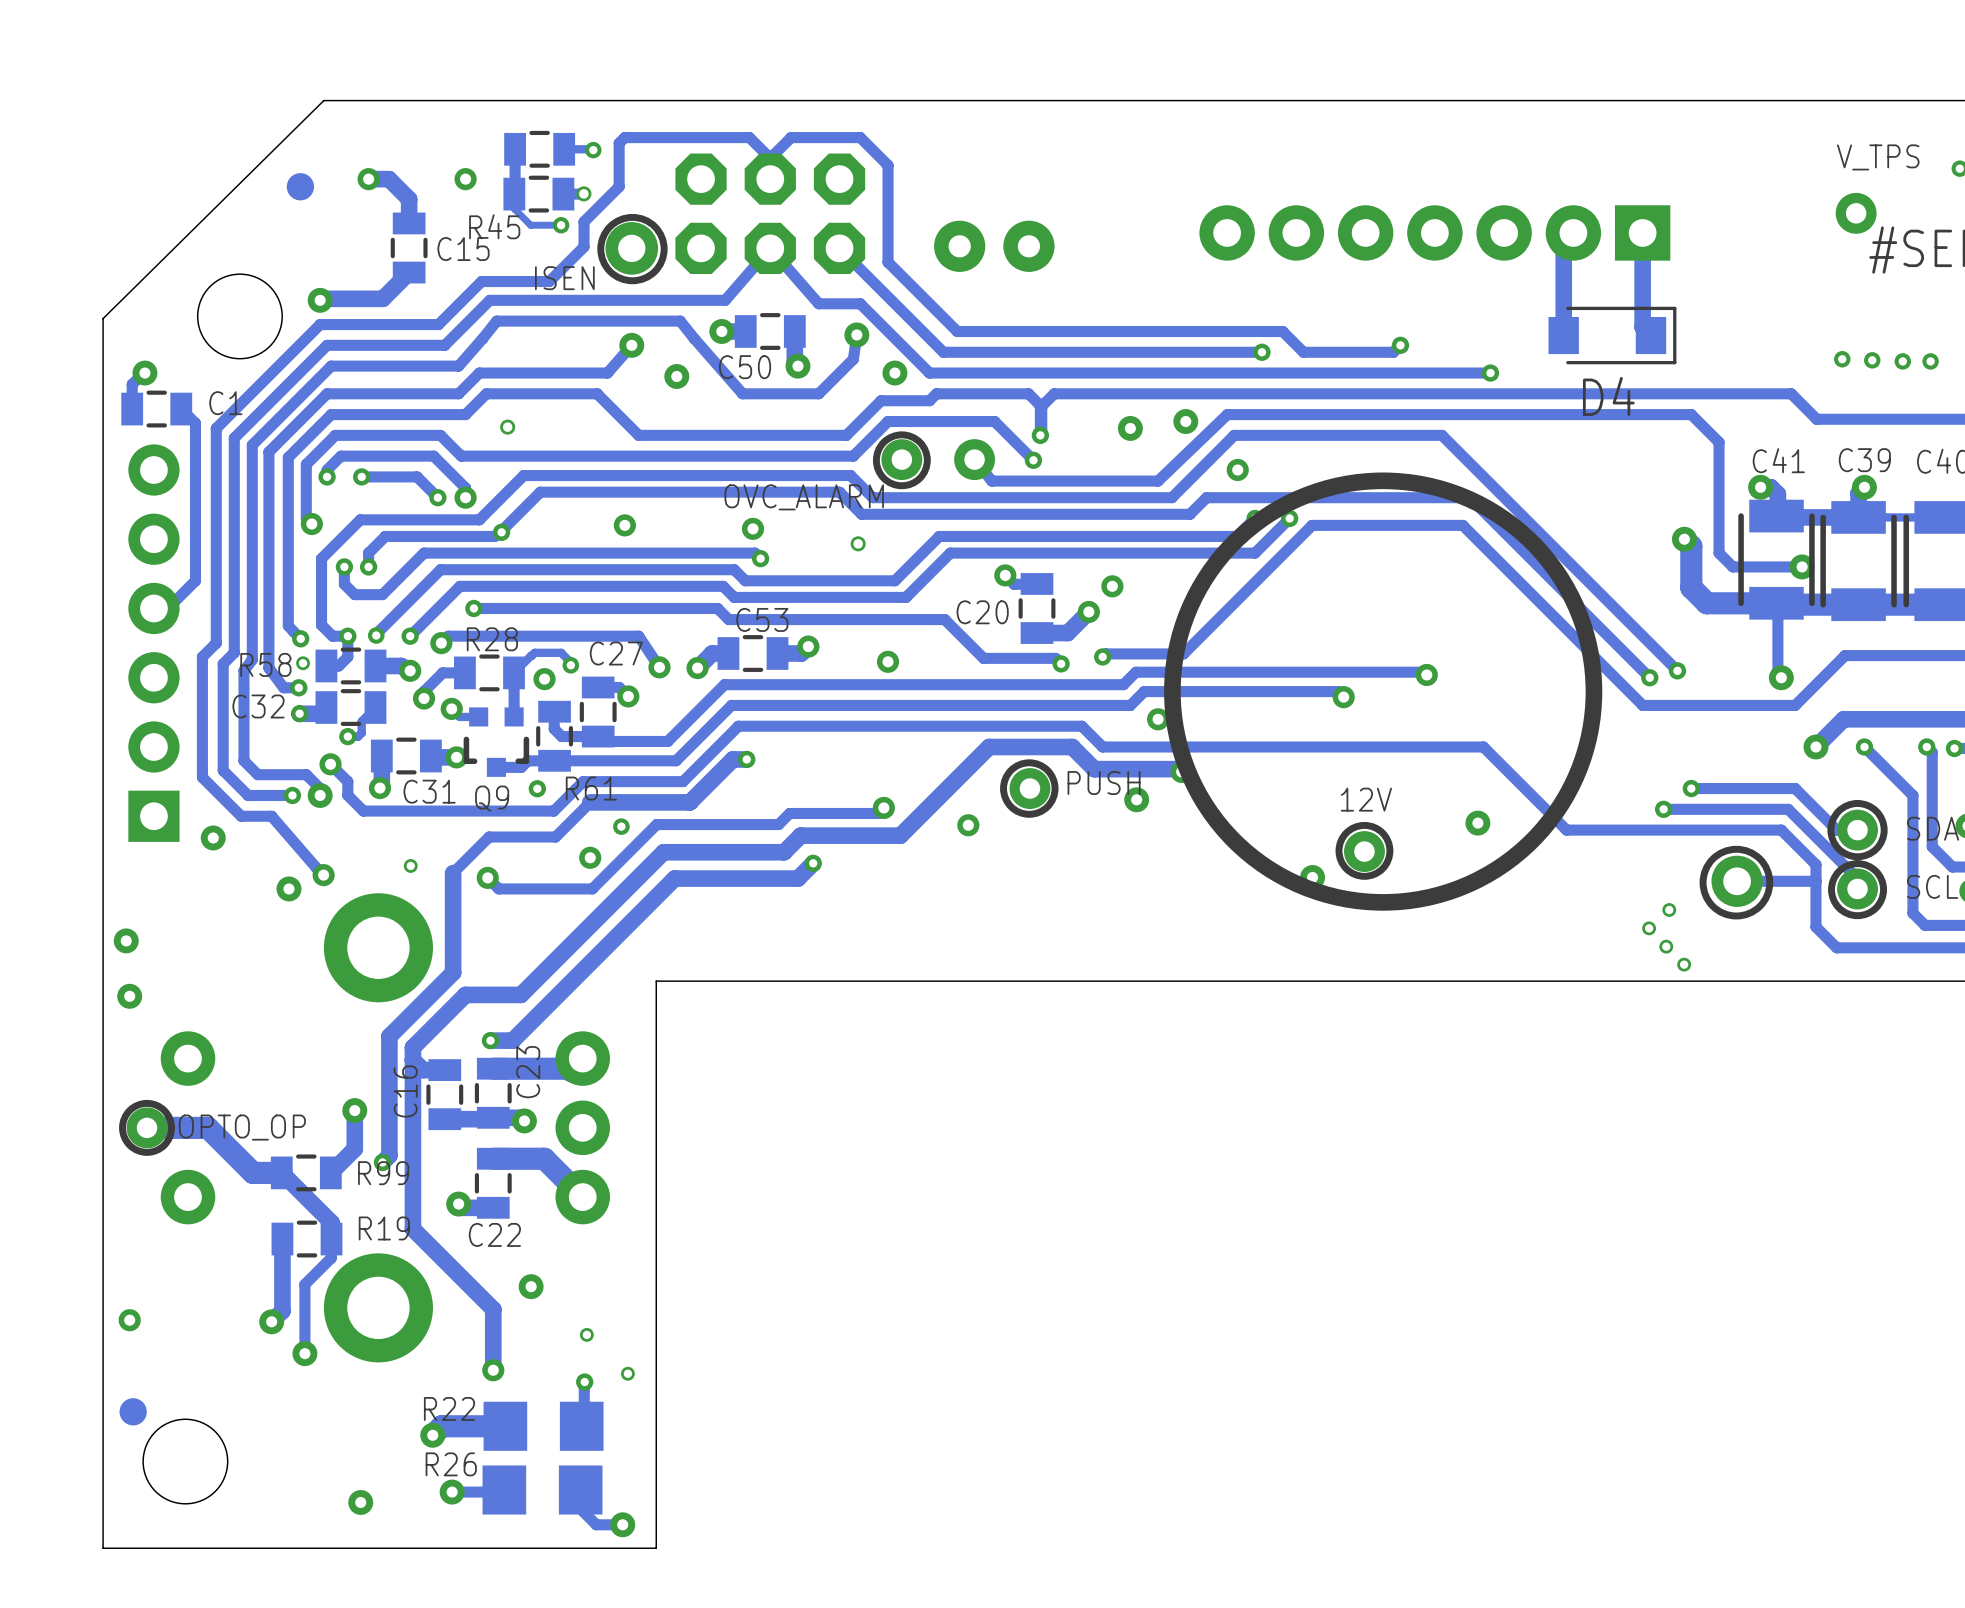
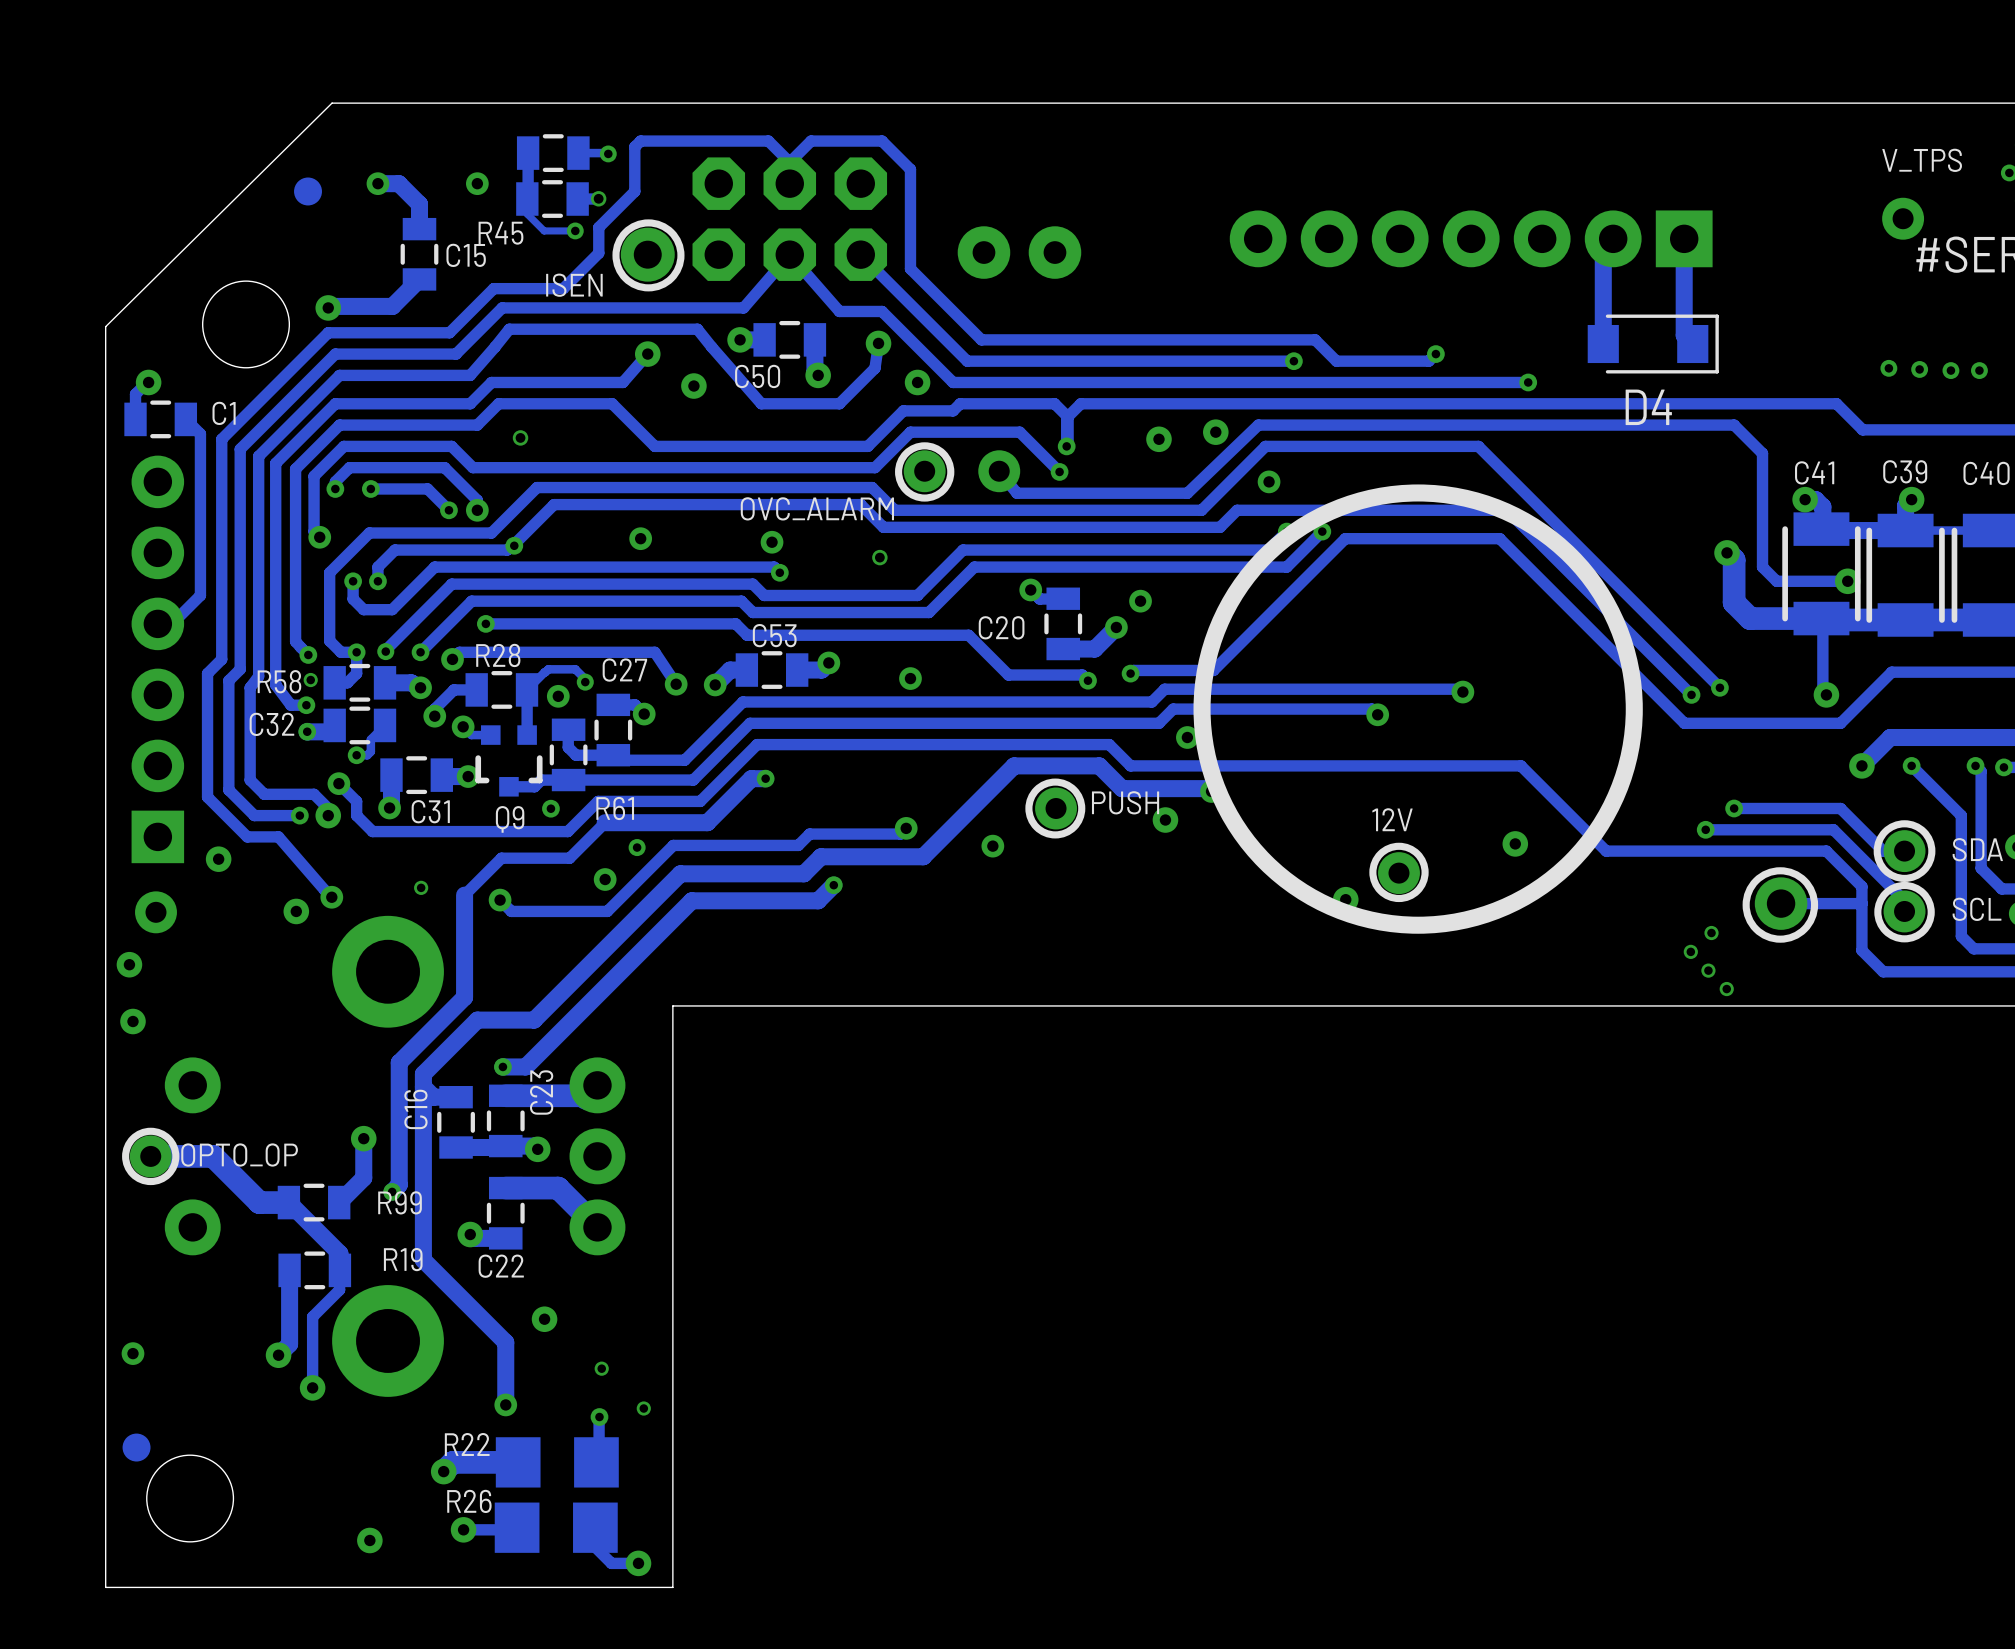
part: none -> (156, 912)

